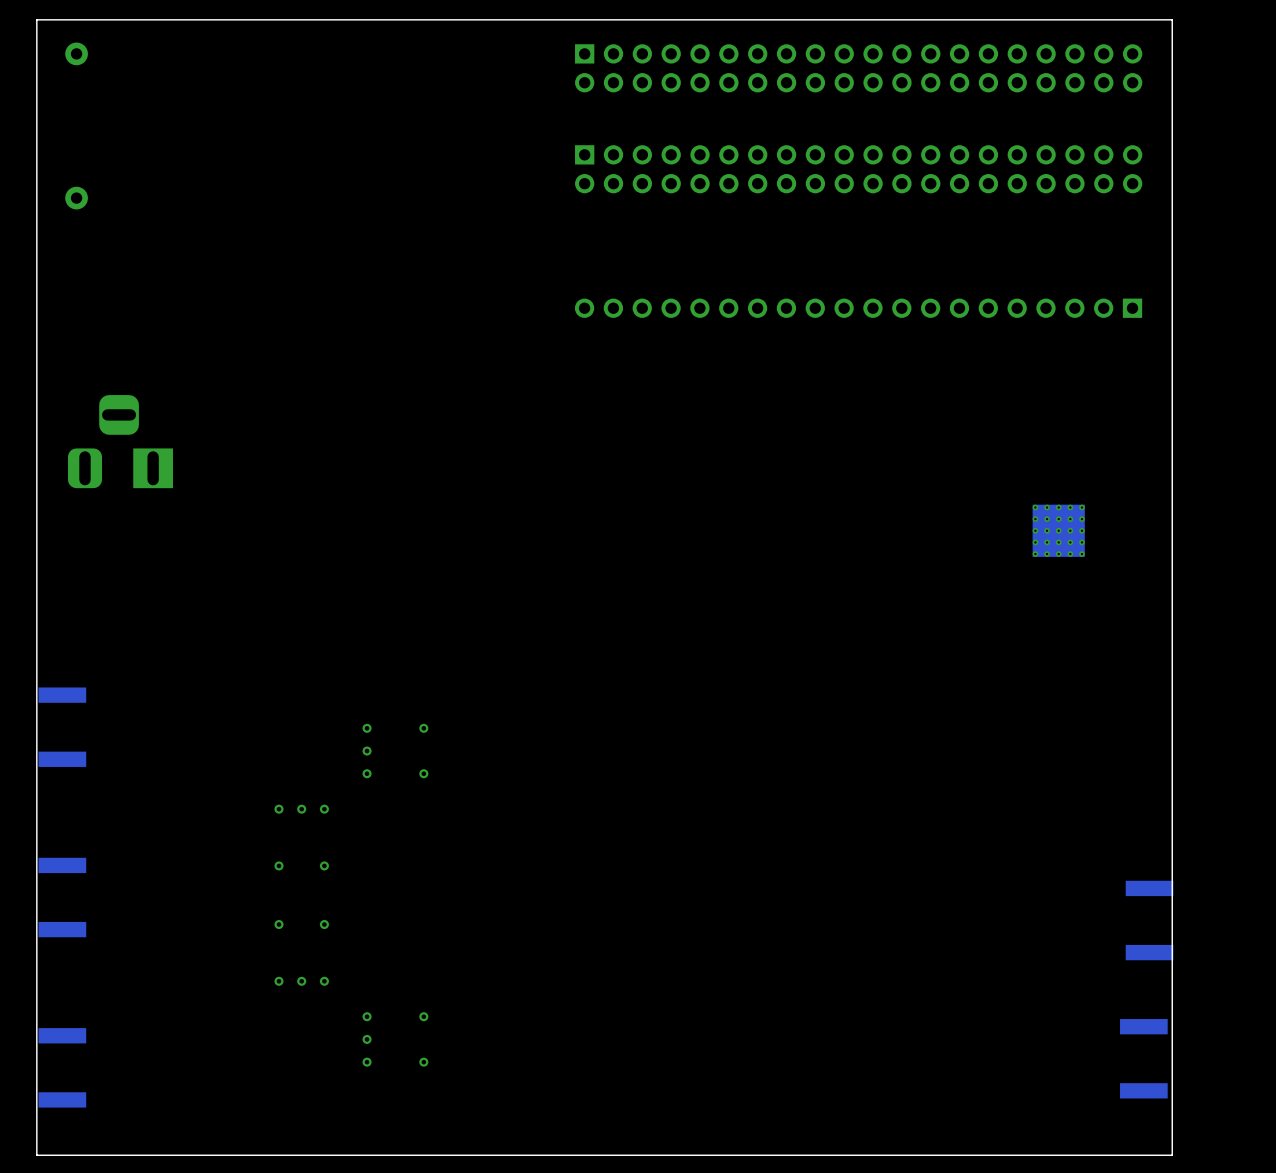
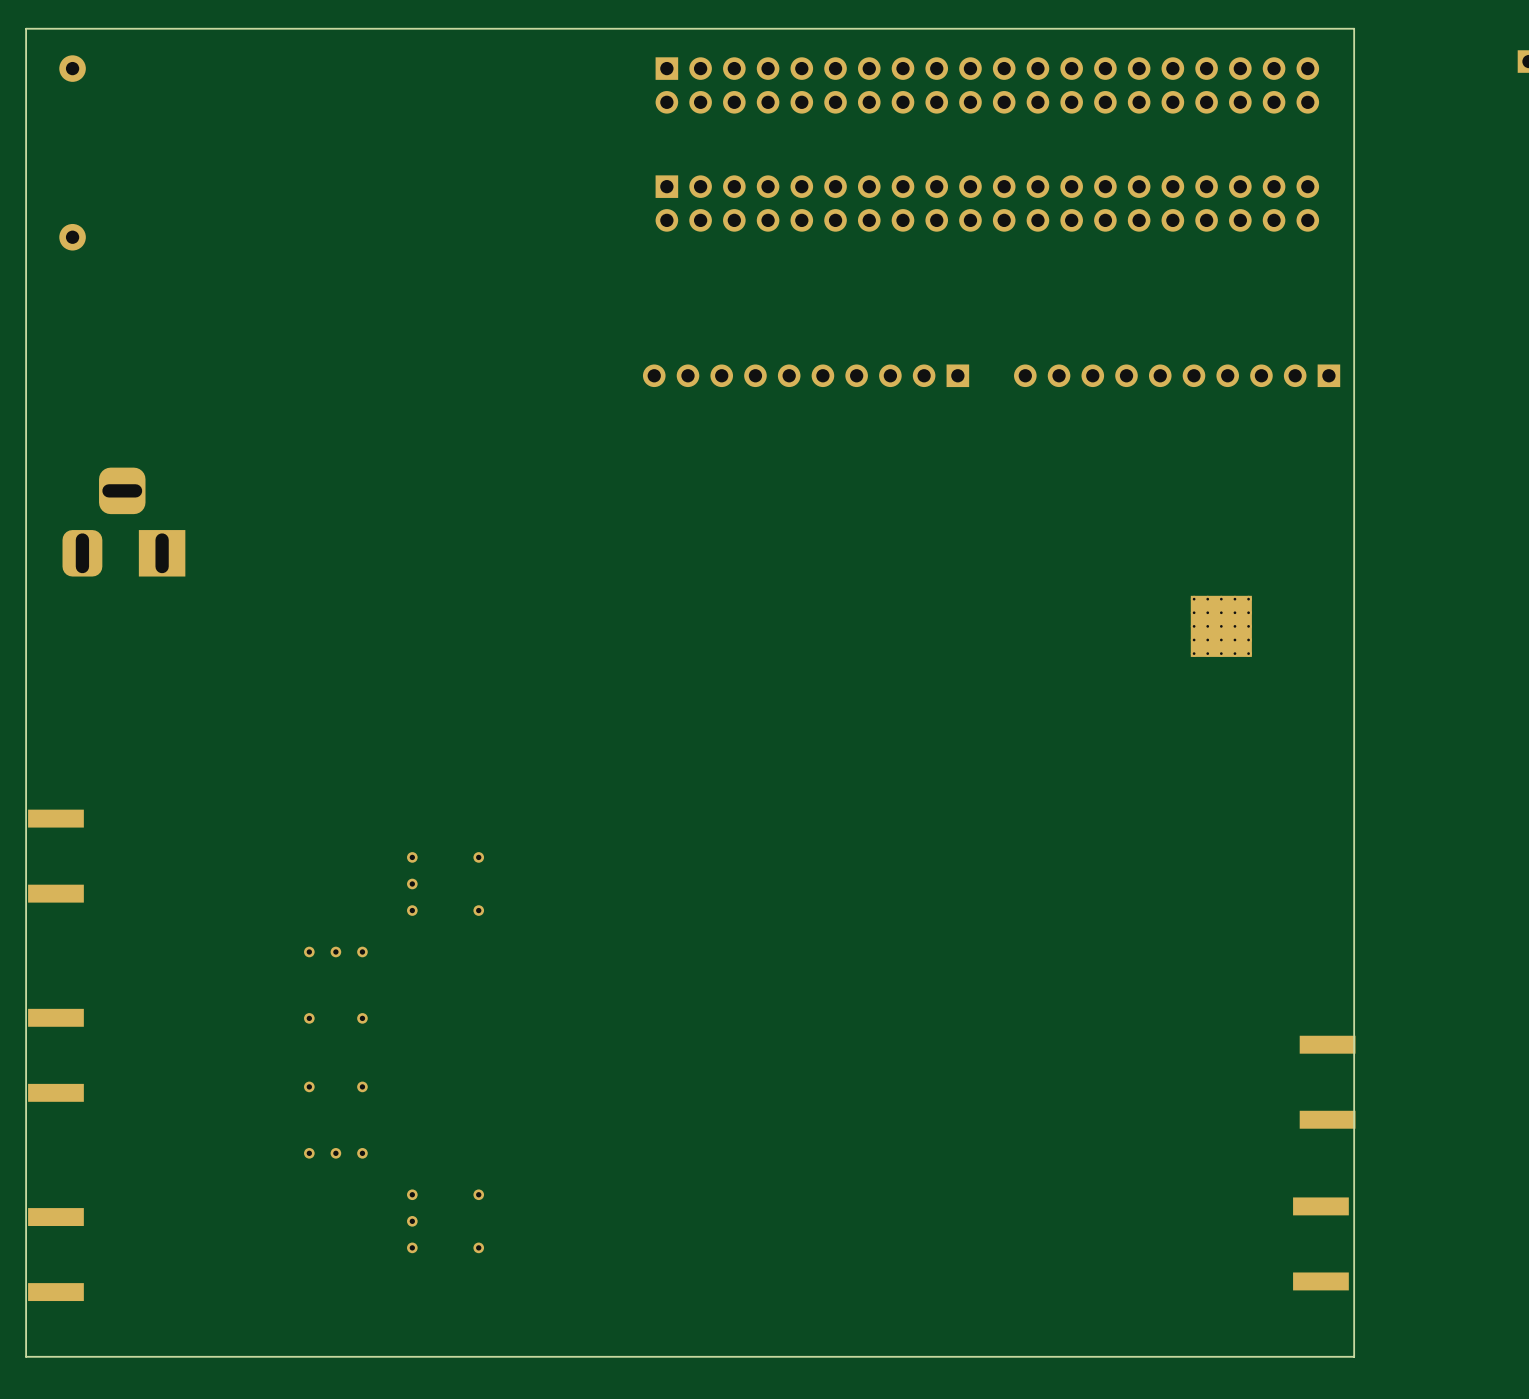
part: (858, 308) -> none
part: none -> (806, 375)
part: none -> (1177, 375)

